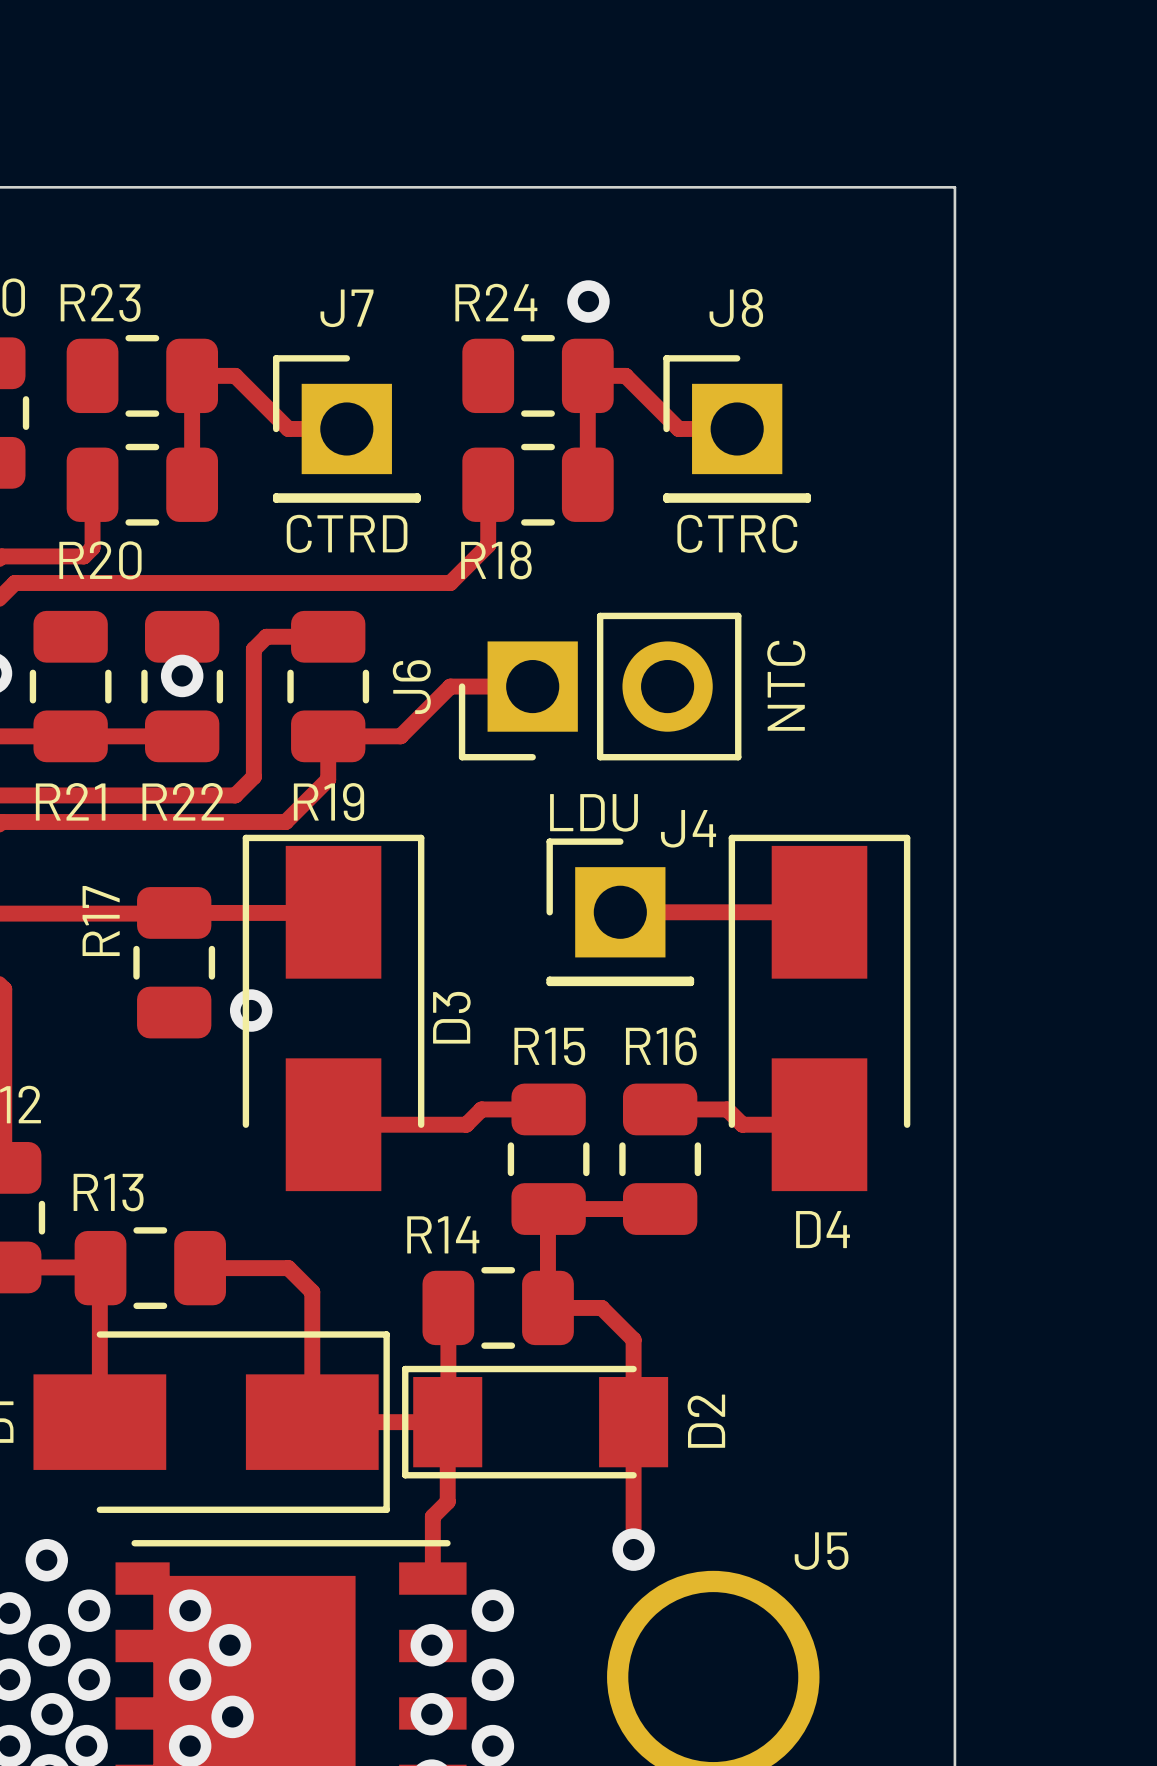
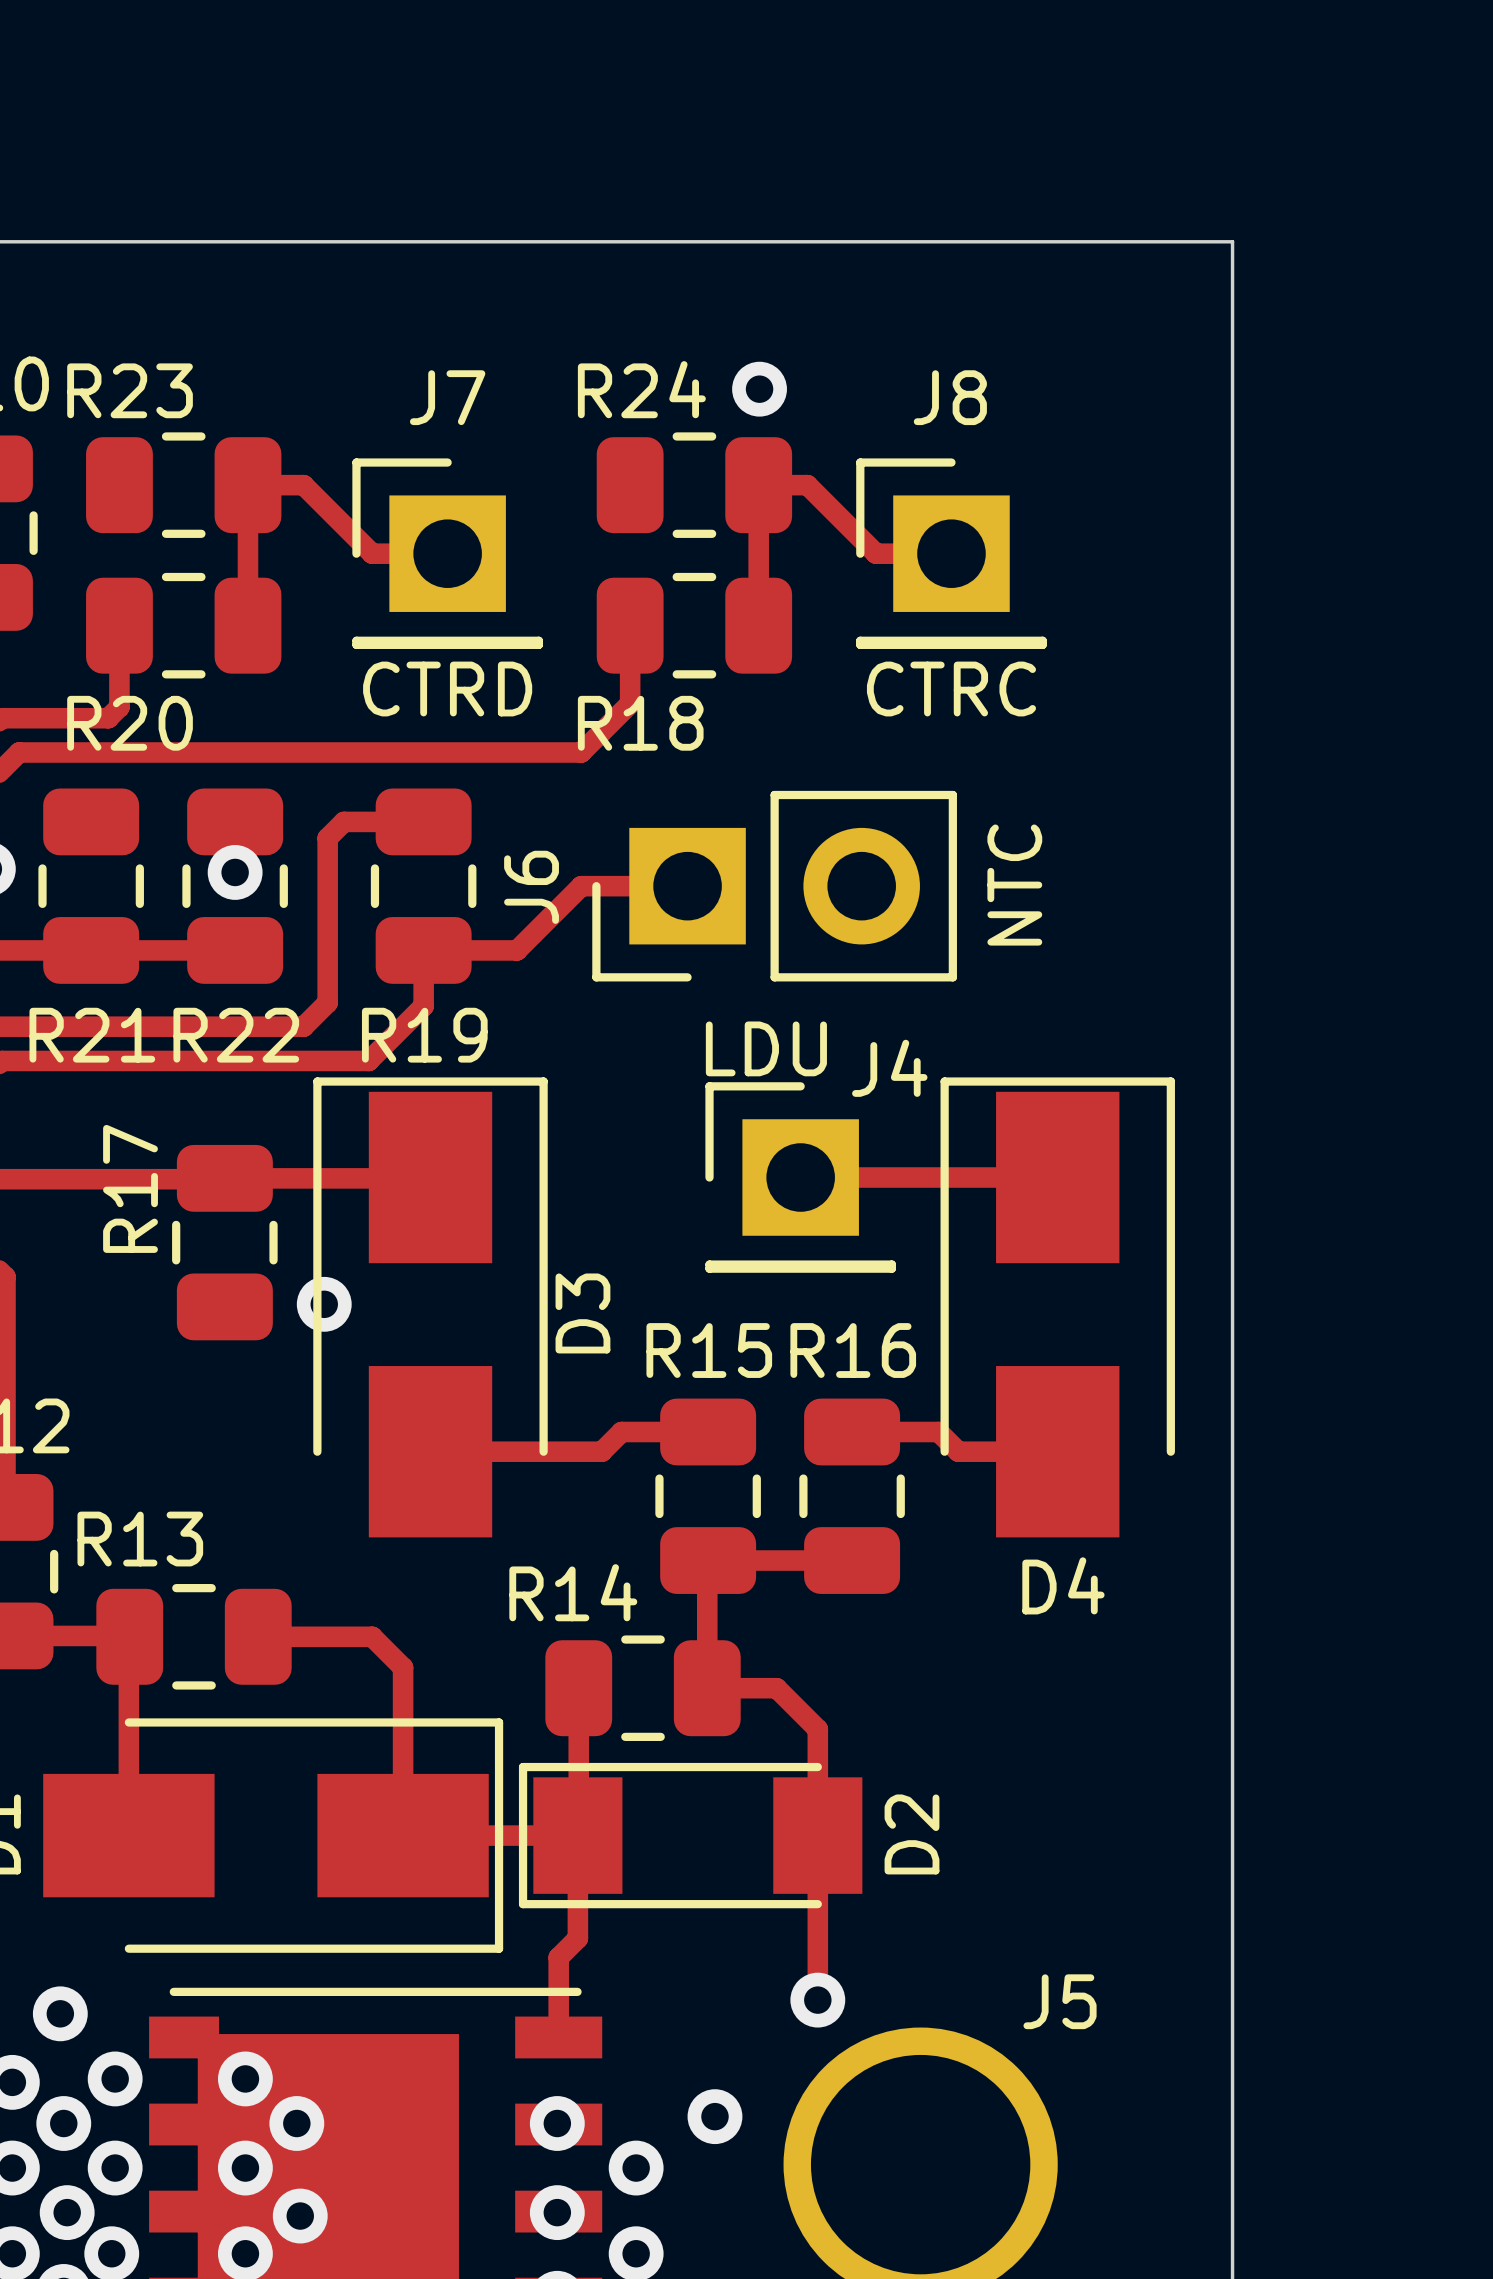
via position: (492, 1610) -> (714, 2116)

